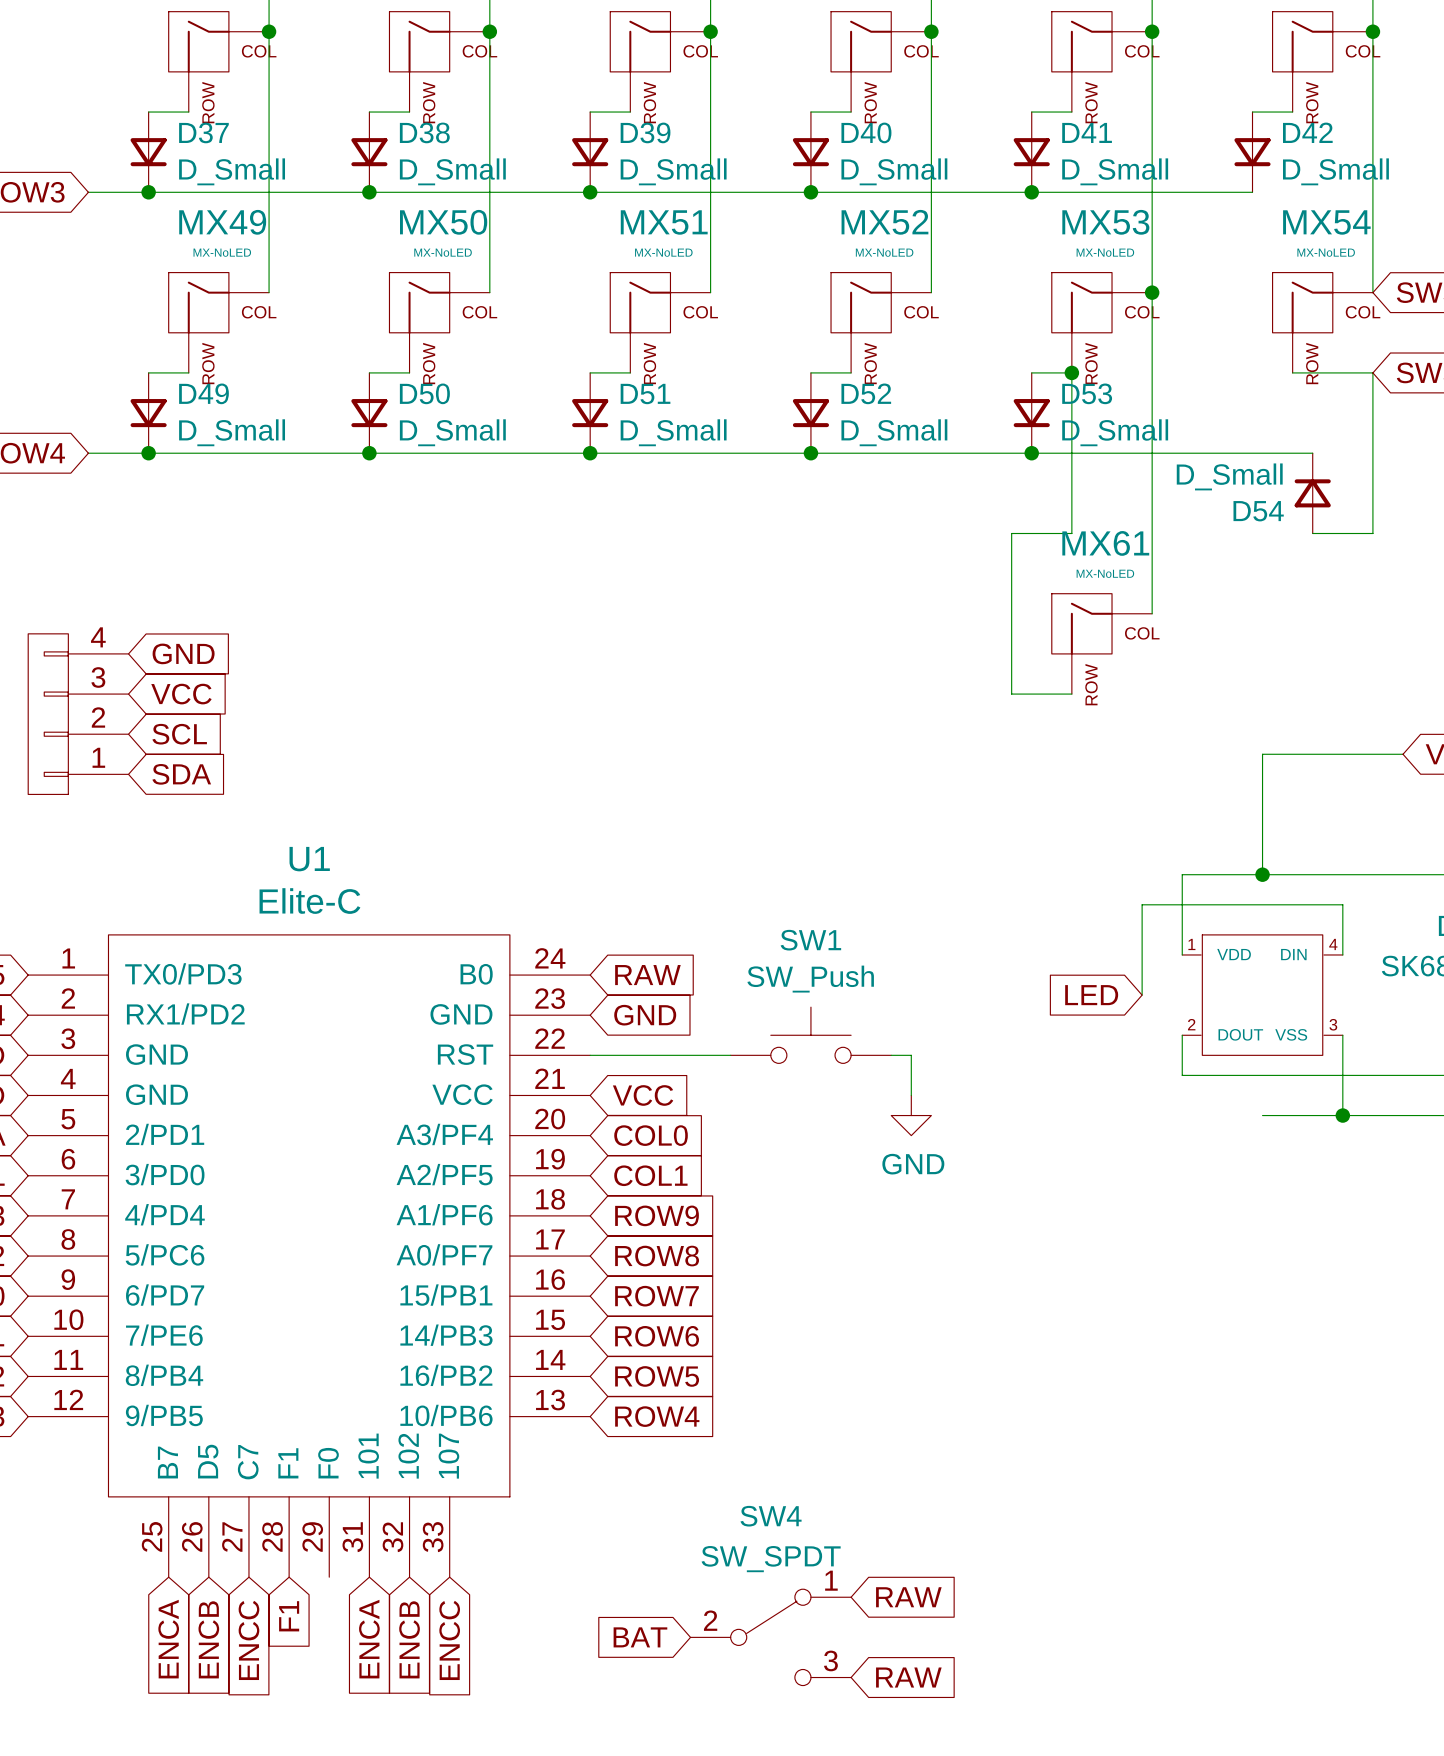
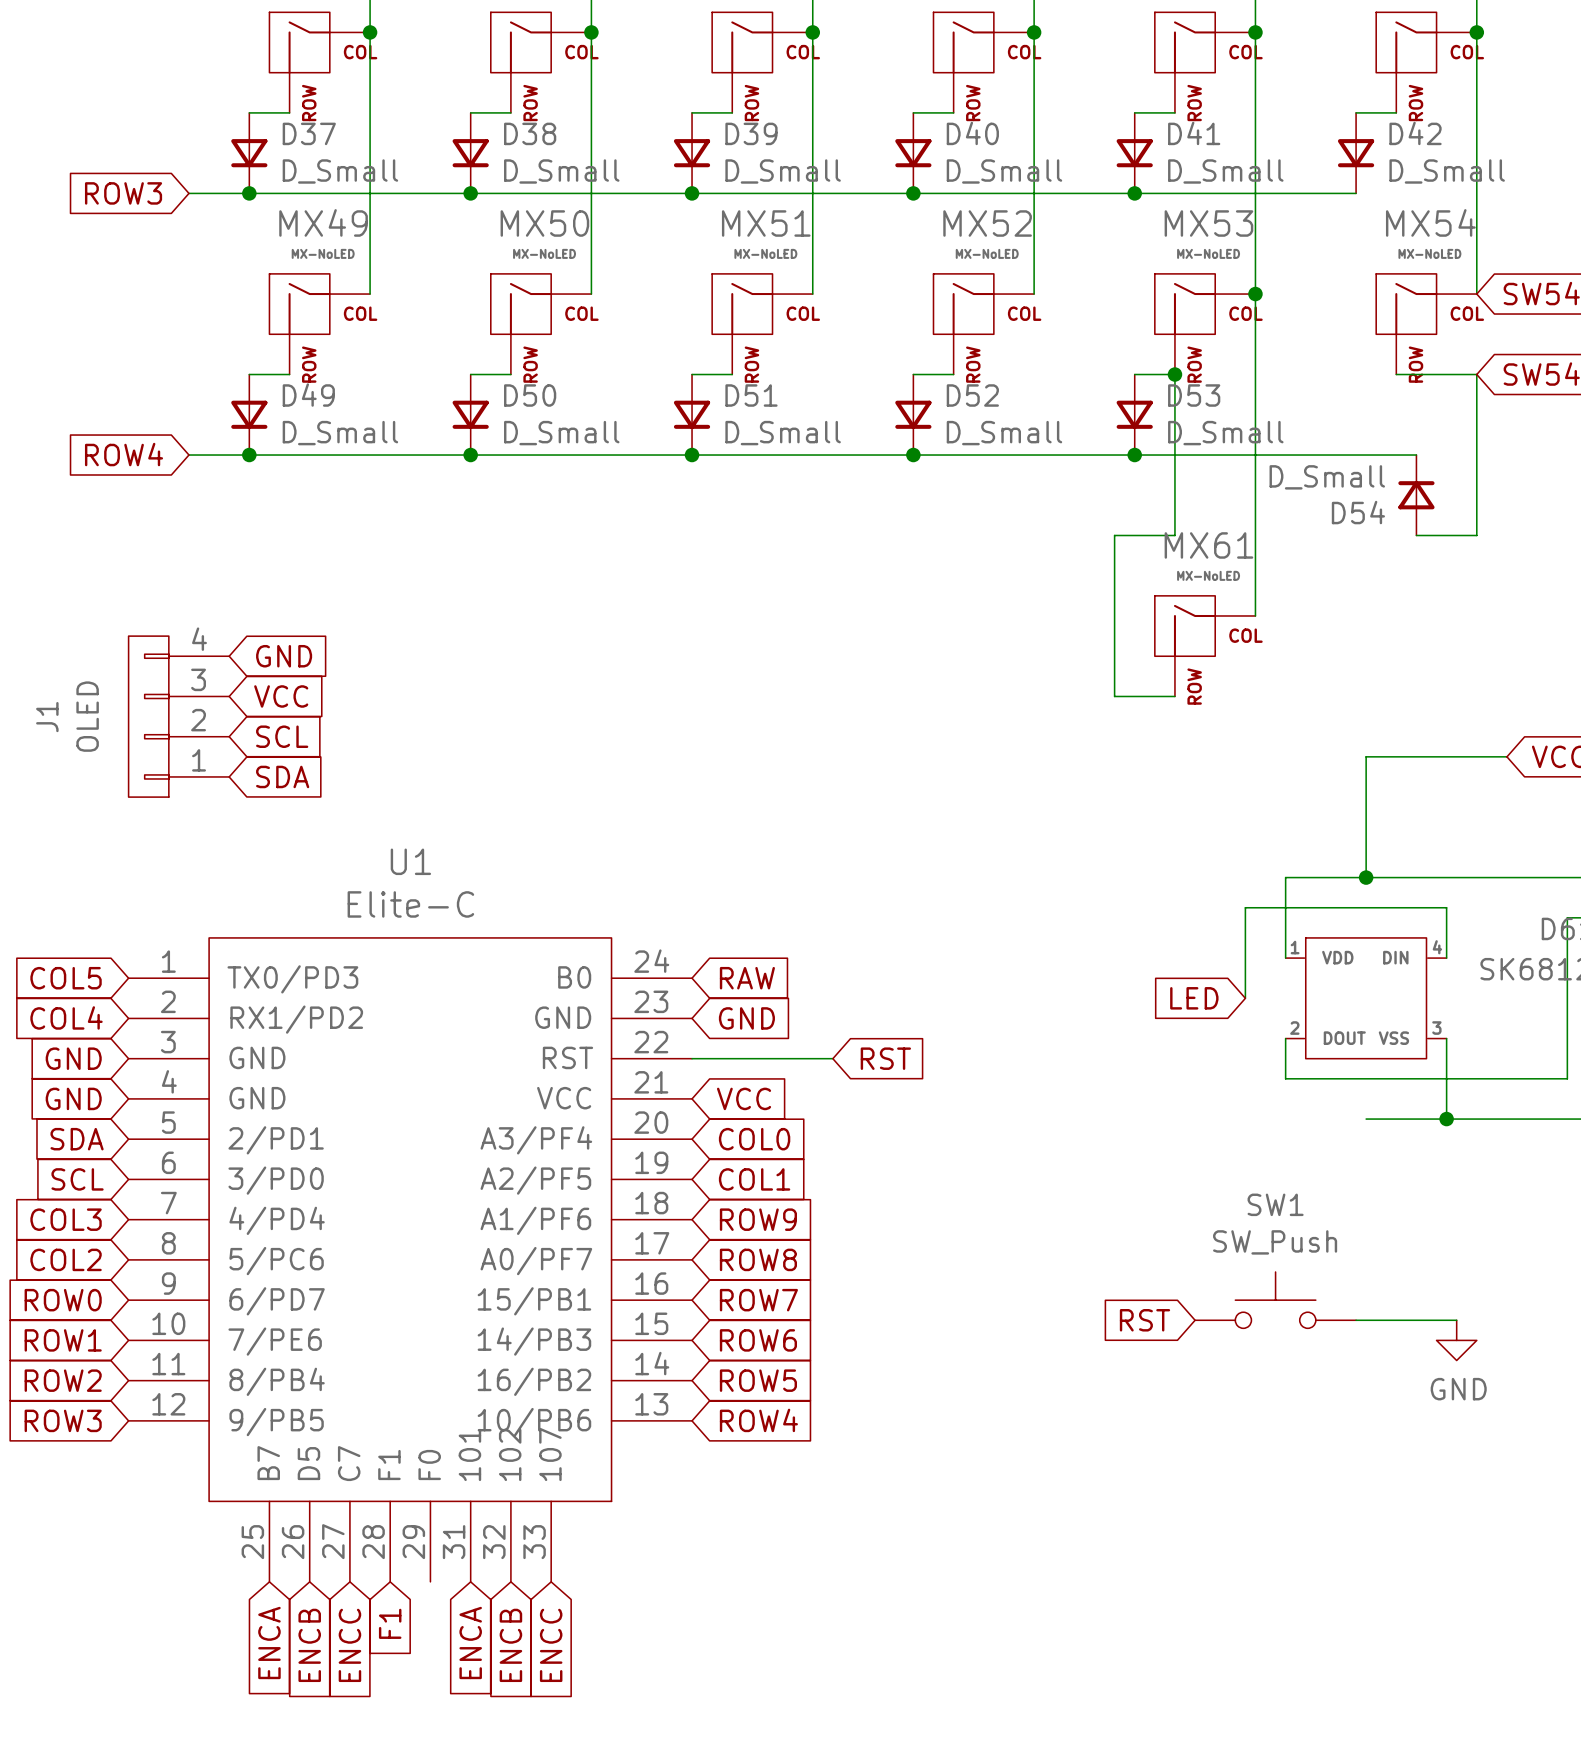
SW1 position: (810, 1035) -> (1275, 1300)
global label: none -> RST (885, 1058)
wire: (891, 1055) (911, 1055) (911, 1095) -> none
power symbol: GND (911, 1115) -> none
global label: none -> RST (1144, 1320)
wire: none -> (1356, 1320) (1456, 1320)
power symbol: none -> GND (1456, 1340)
global label: RAW (908, 1597) -> none
global label: BAT (640, 1637) -> none
SW4: SW_SPDT (770, 1637) -> none
global label: RAW (908, 1677) -> none

